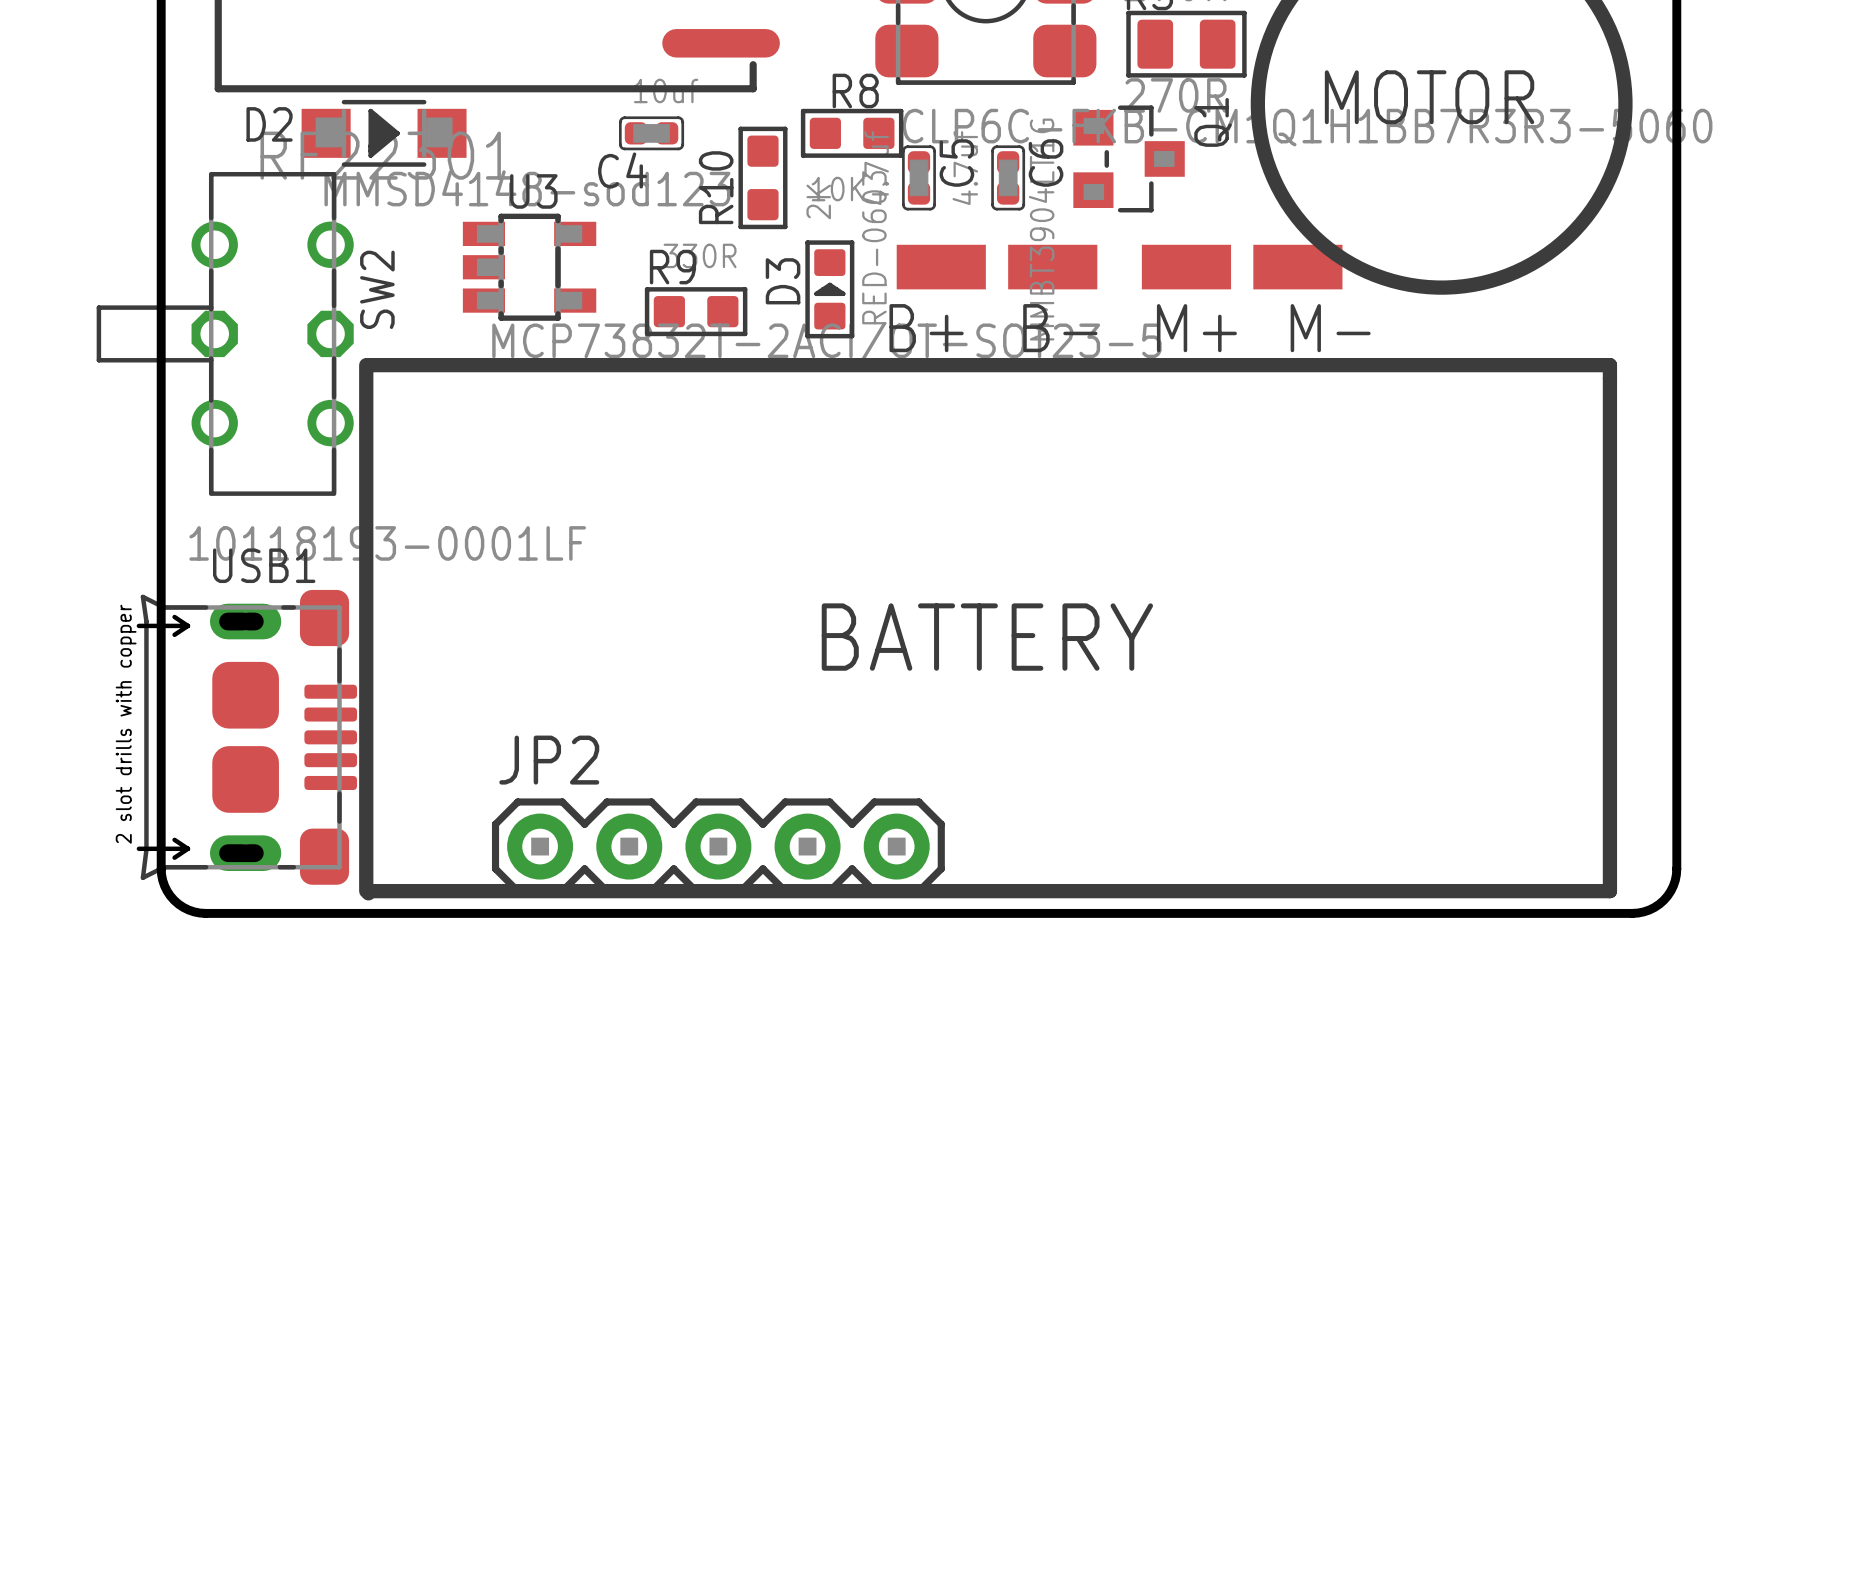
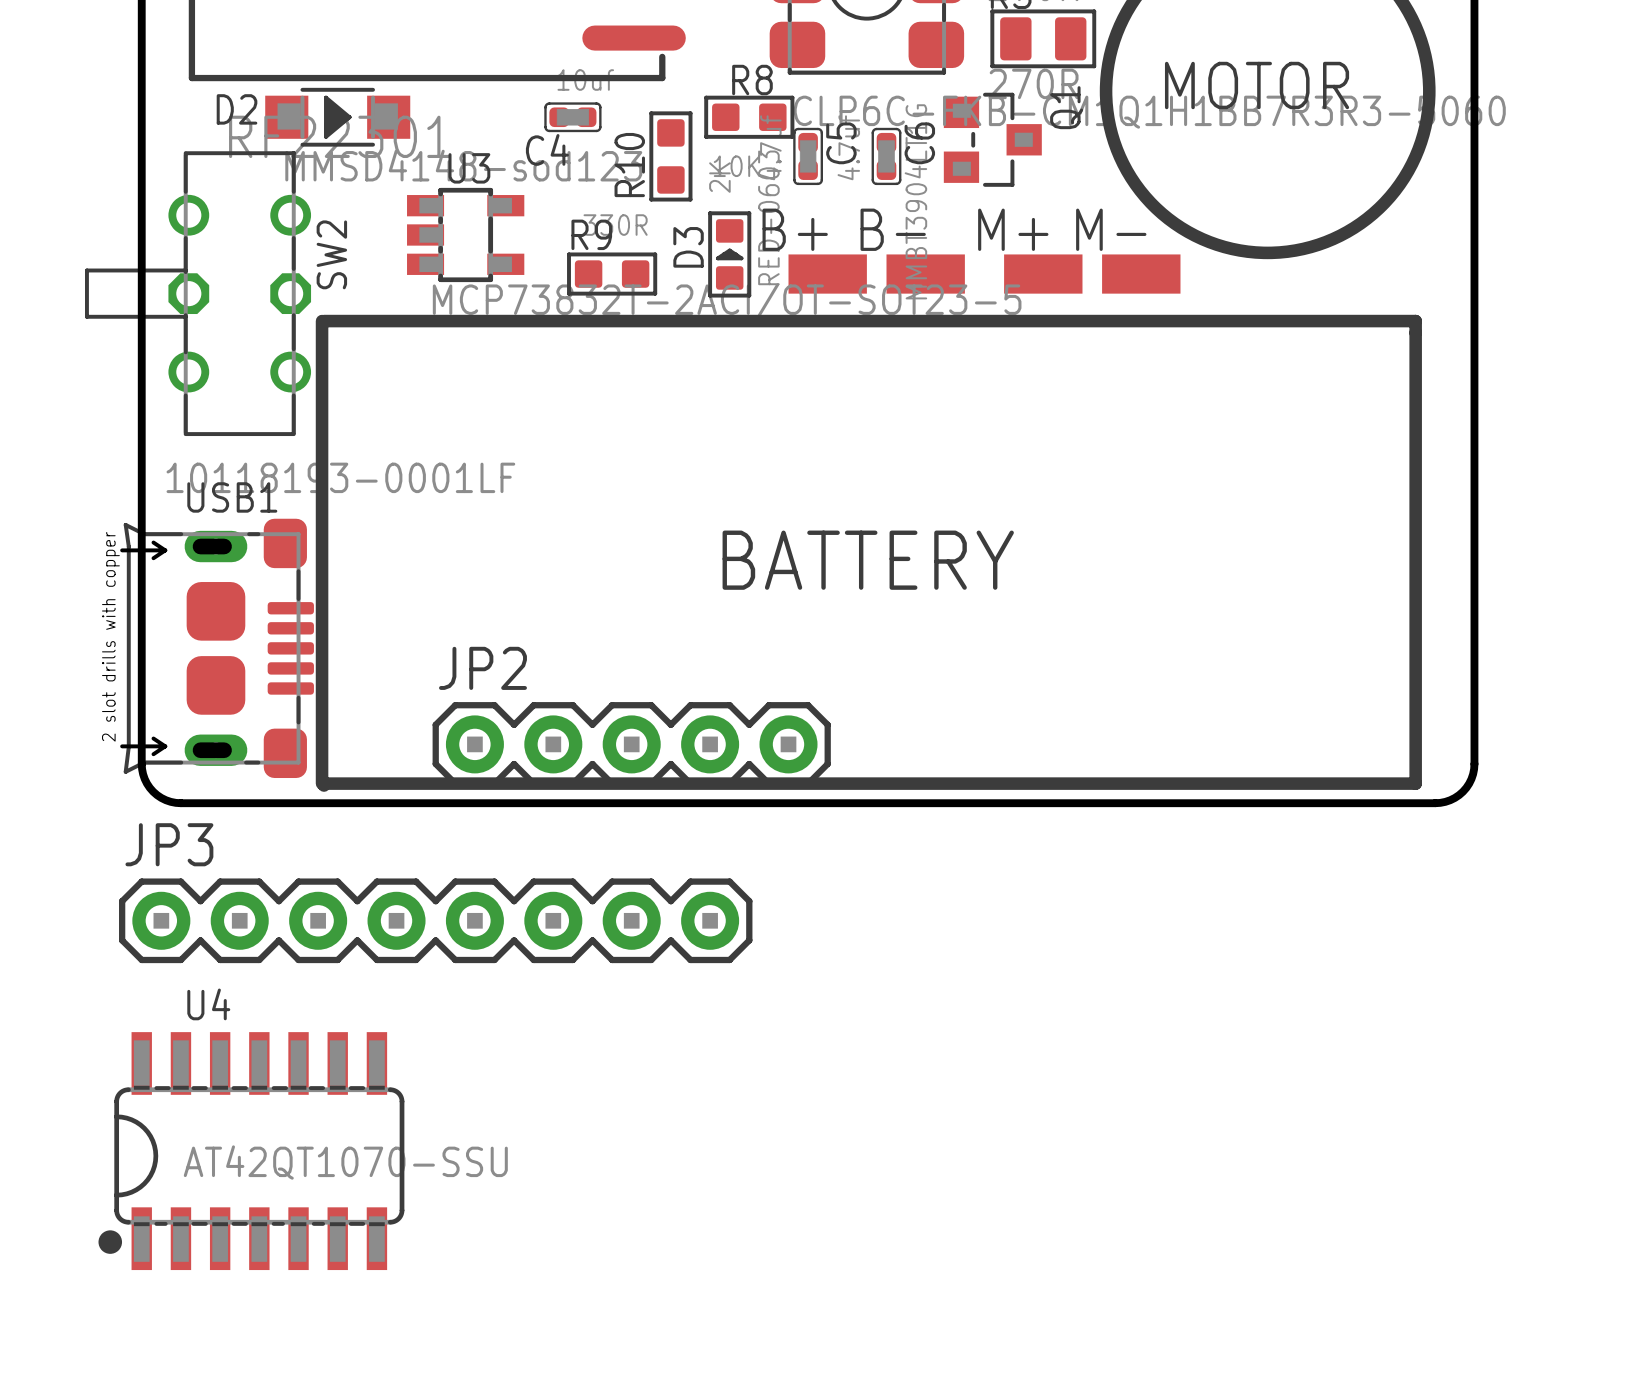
B+ position: (941, 267) -> (827, 274)
B- position: (1052, 267) -> (925, 274)
M+ position: (1186, 267) -> (1043, 274)
M- position: (1297, 267) -> (1141, 274)
B+ name position: B+ (926, 328) -> B+ (795, 229)
B- name position: B- (1060, 328) -> B- (893, 229)
M+ name position: M+ (1196, 328) -> M+ (1013, 229)
M- name position: M- (1330, 328) -> M- (1111, 229)
JP3: none -> (435, 920)
U4: none -> AT42QT1070-SSU (251, 1151)

